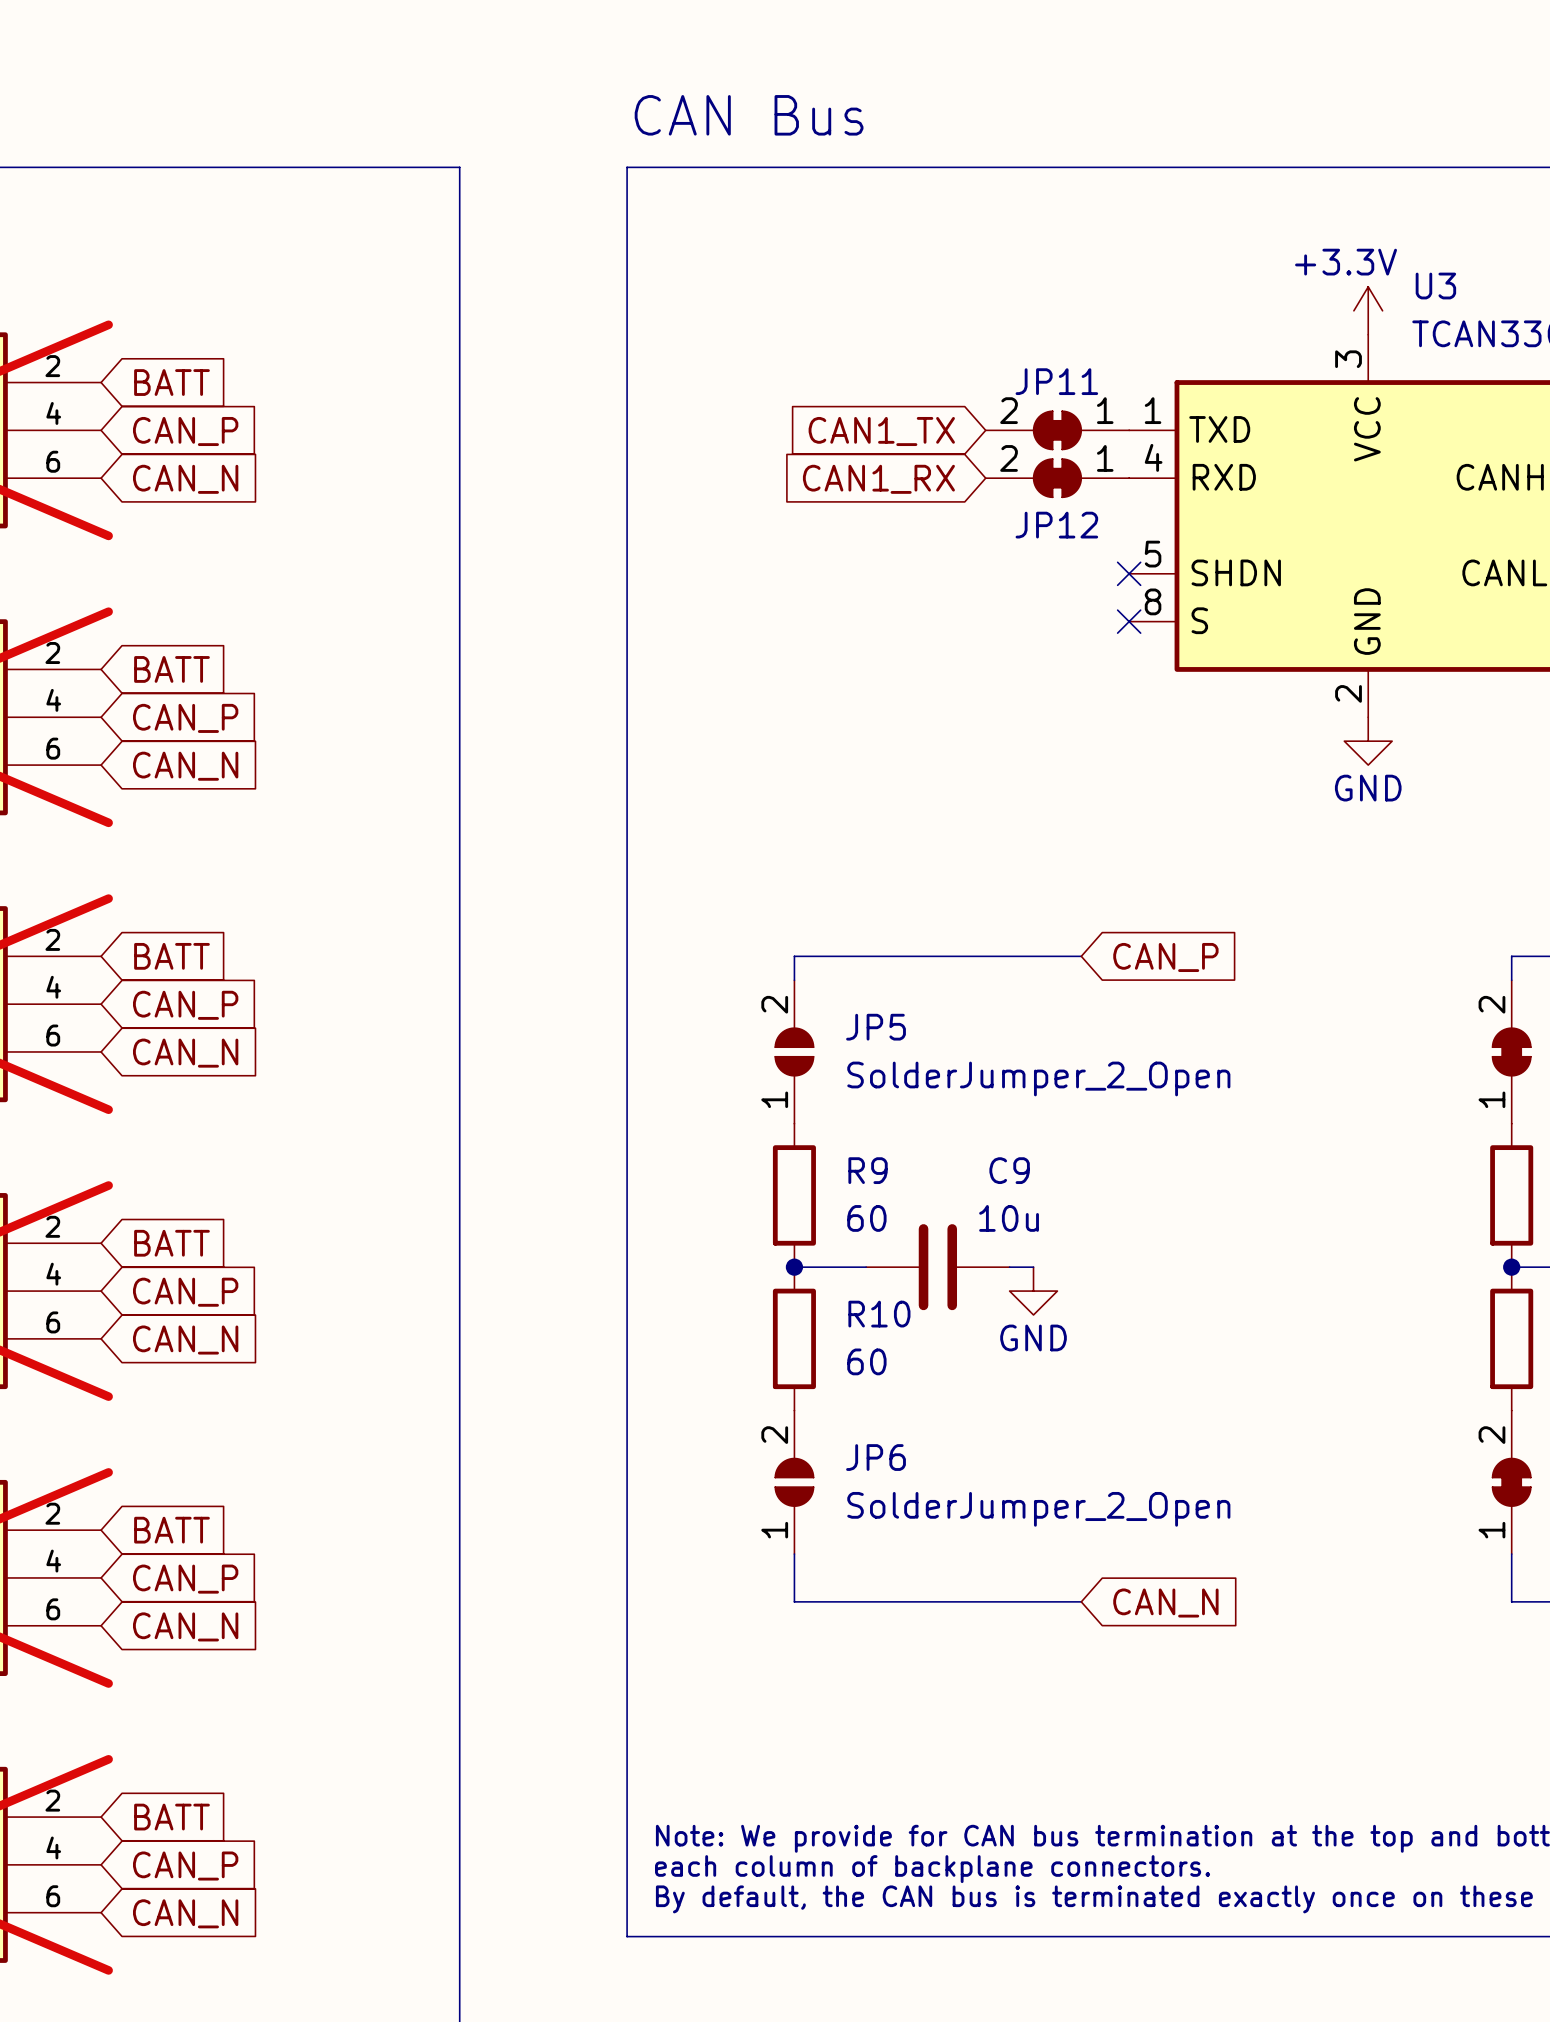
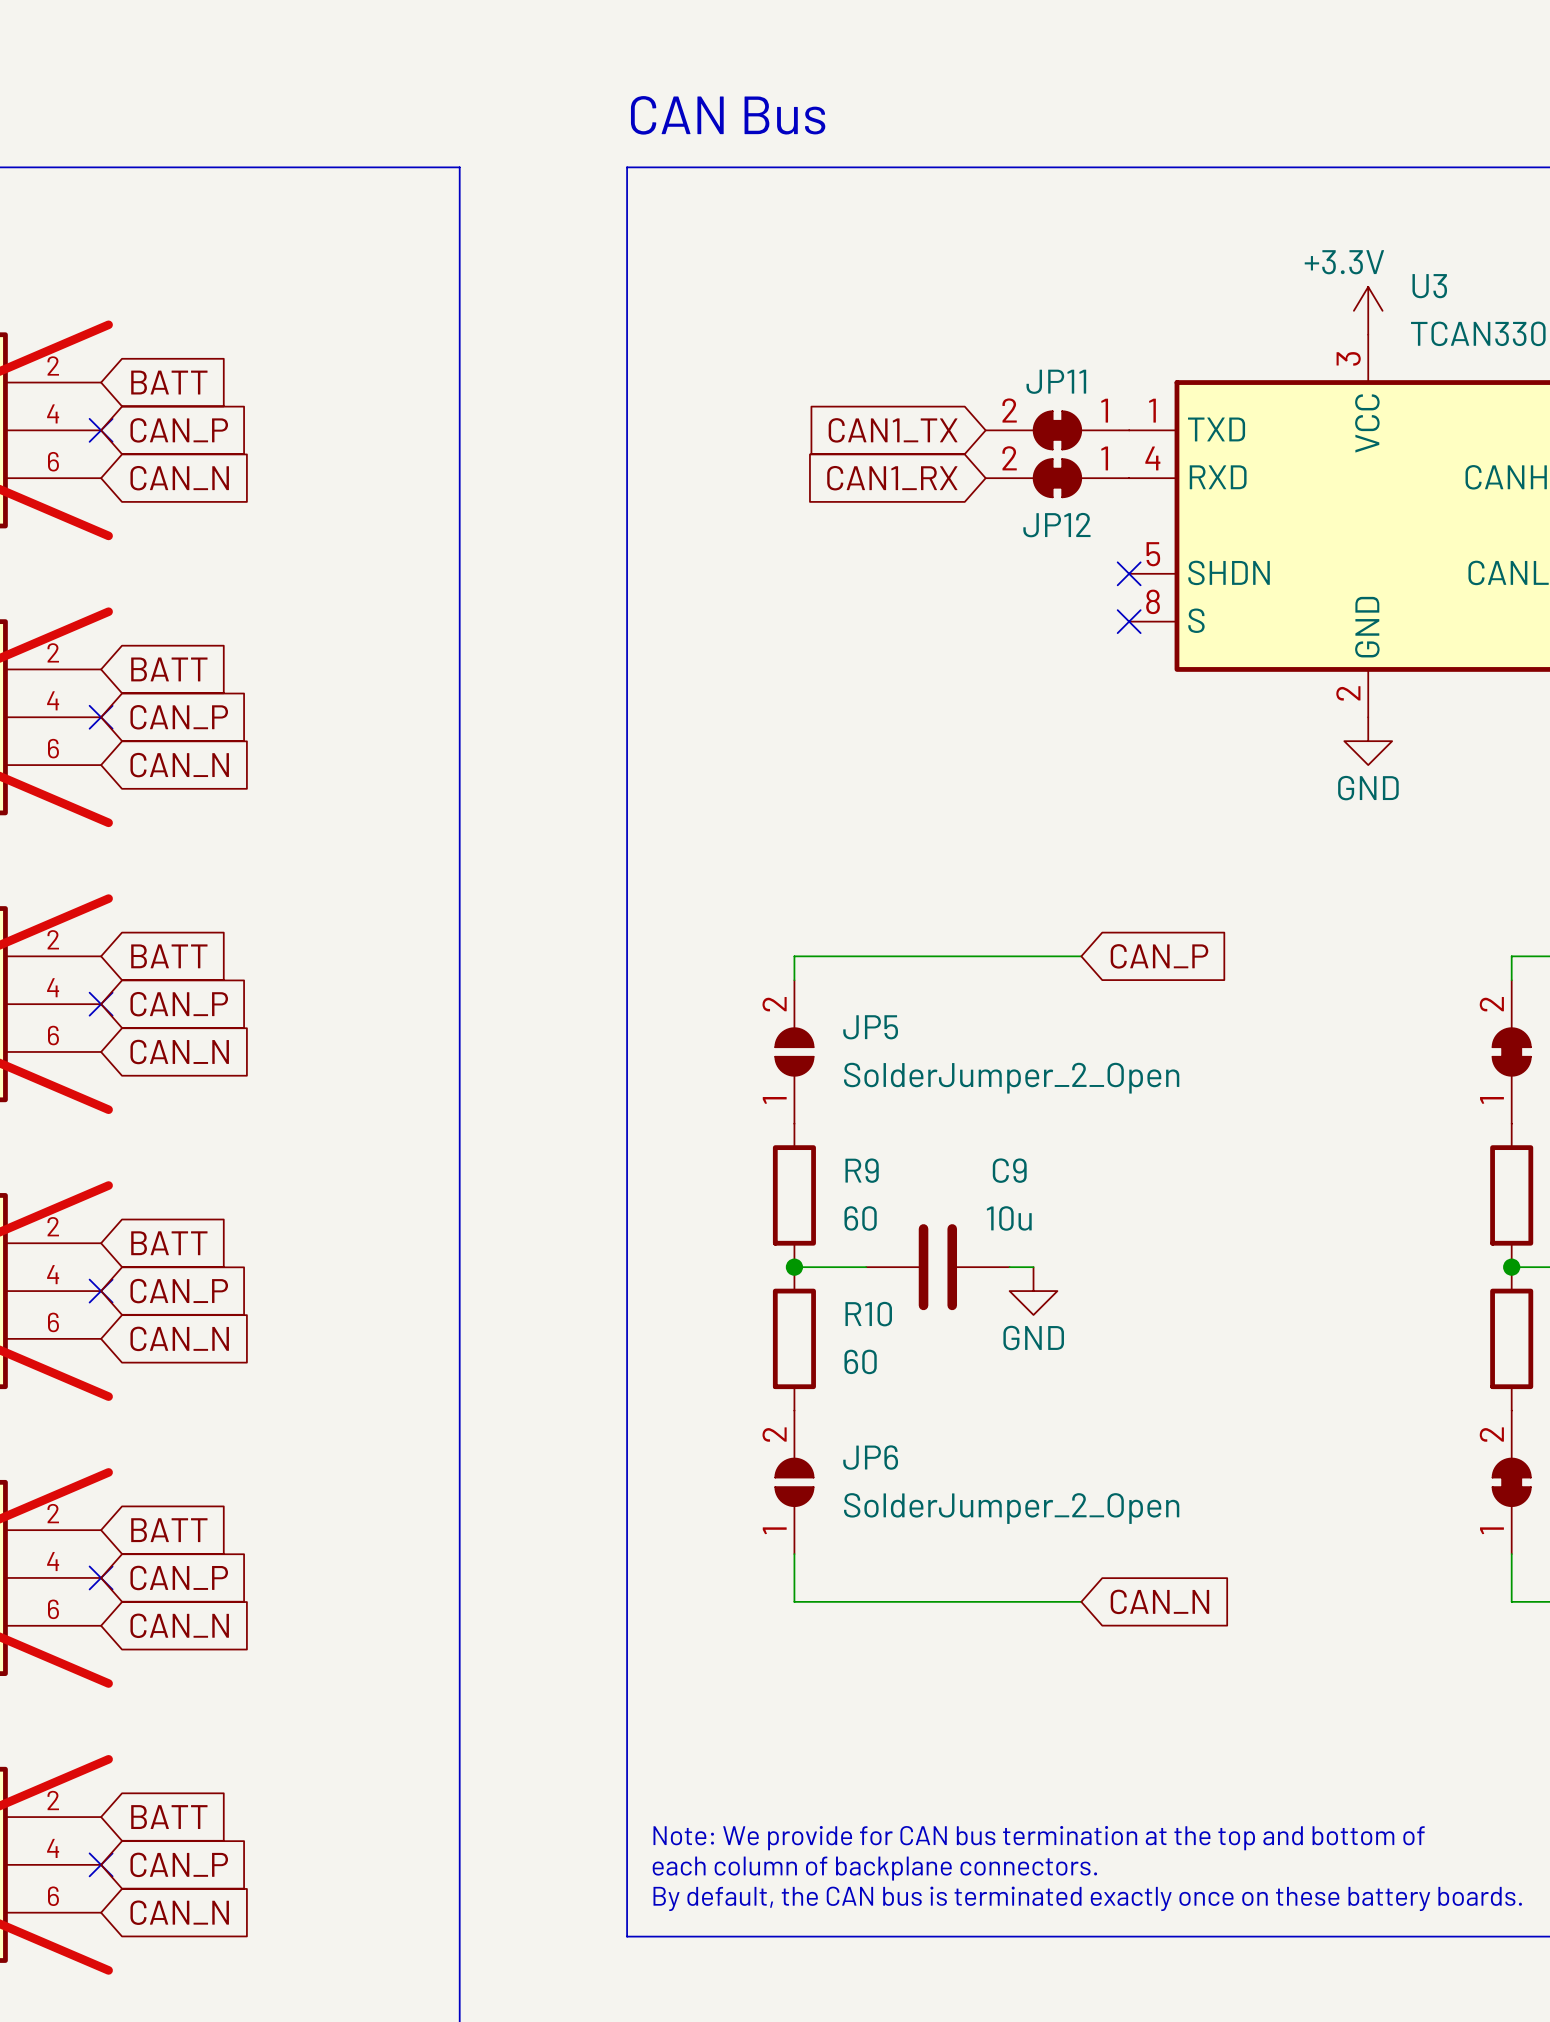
no-connect mark: none -> (101, 430)
no-connect mark: none -> (101, 717)
no-connect mark: none -> (101, 1004)
no-connect mark: none -> (101, 1291)
no-connect mark: none -> (101, 1577)
no-connect mark: none -> (101, 1864)

